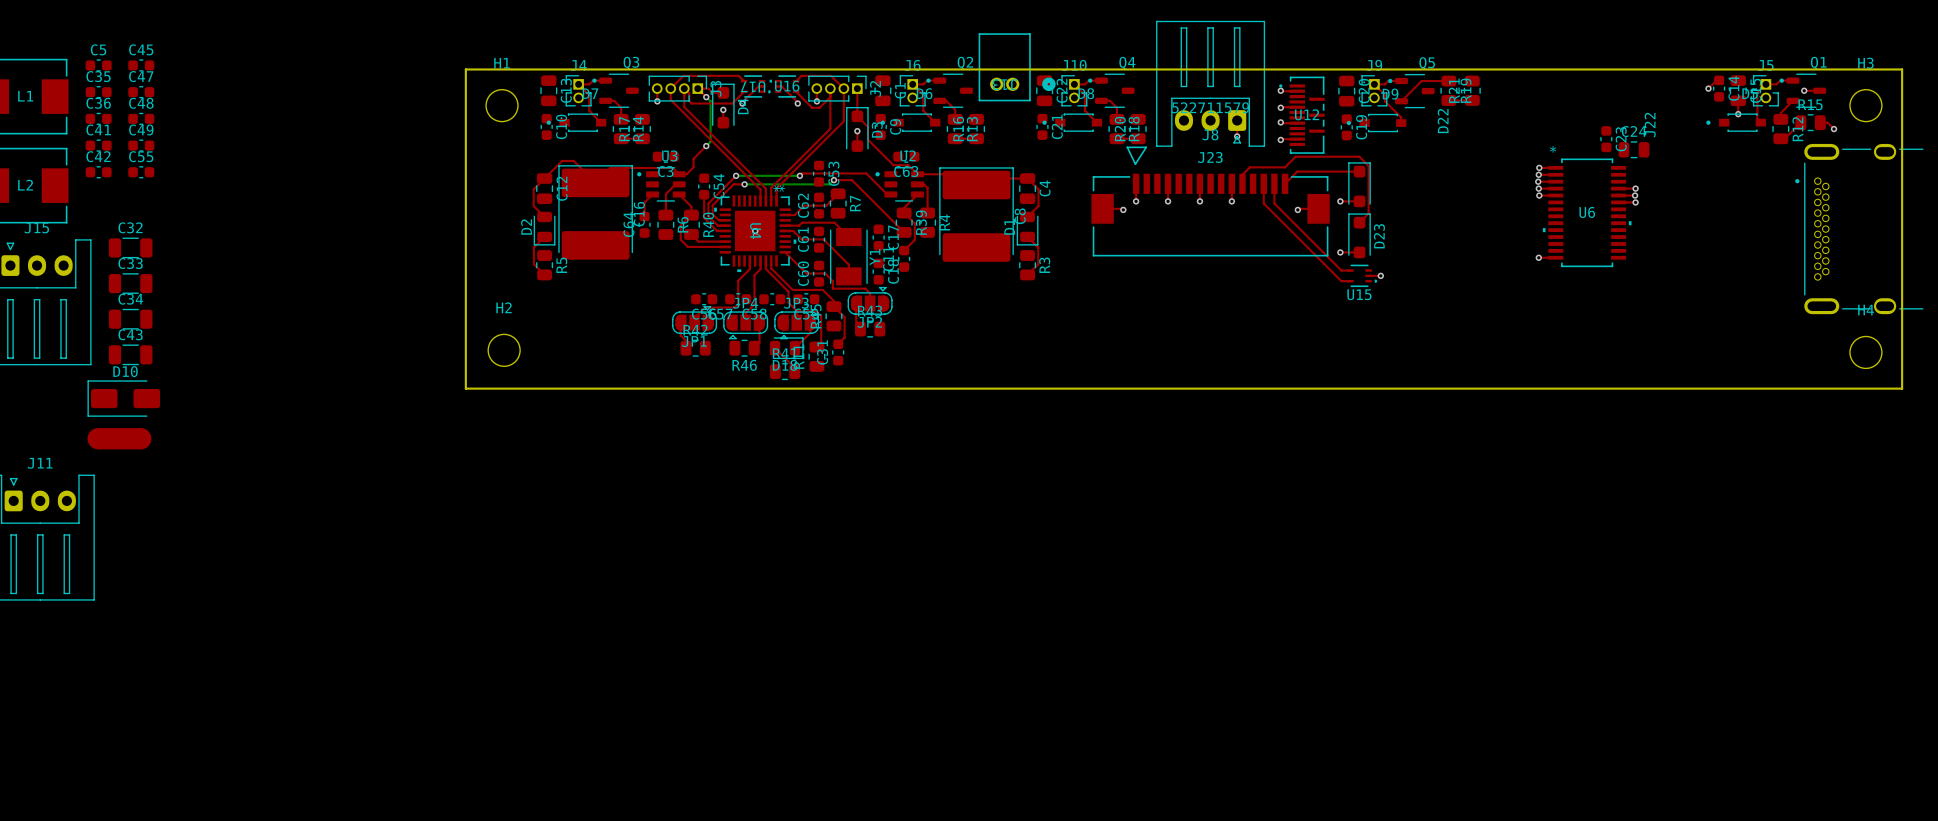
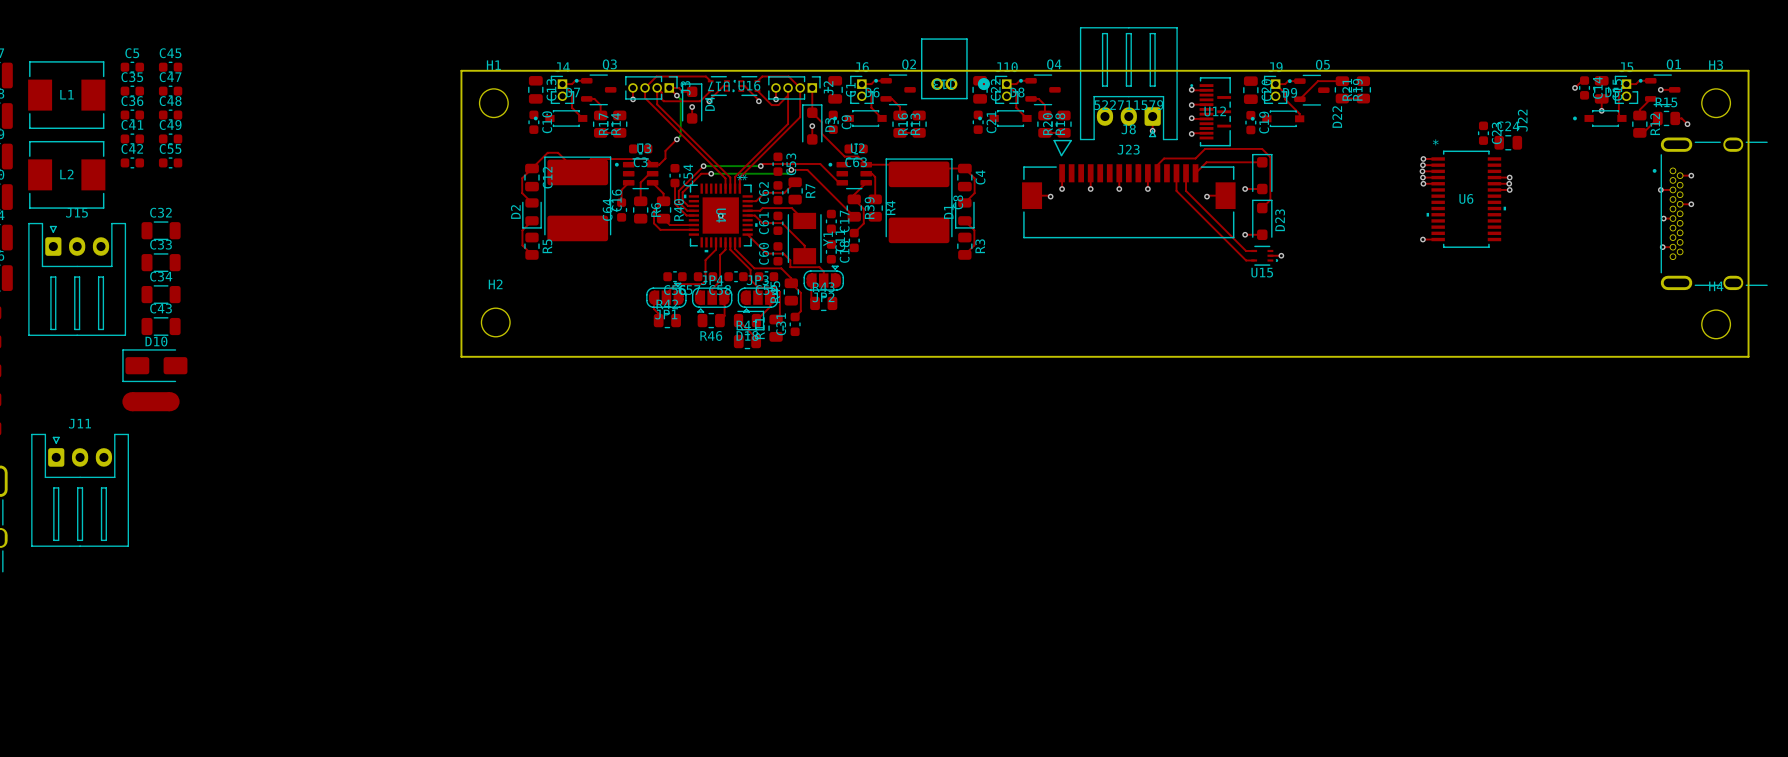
top track: none -> (1680, 175) (1691, 175)
via: none -> (1691, 175)
top track: none -> (1660, 189) (1672, 189)
via: none -> (1660, 189)
top track: none -> (1680, 204) (1691, 204)
via: none -> (1691, 204)
top track: none -> (1663, 218) (1672, 218)
via: none -> (1663, 218)
top track: none -> (1662, 247) (1672, 247)
via: none -> (1662, 247)

